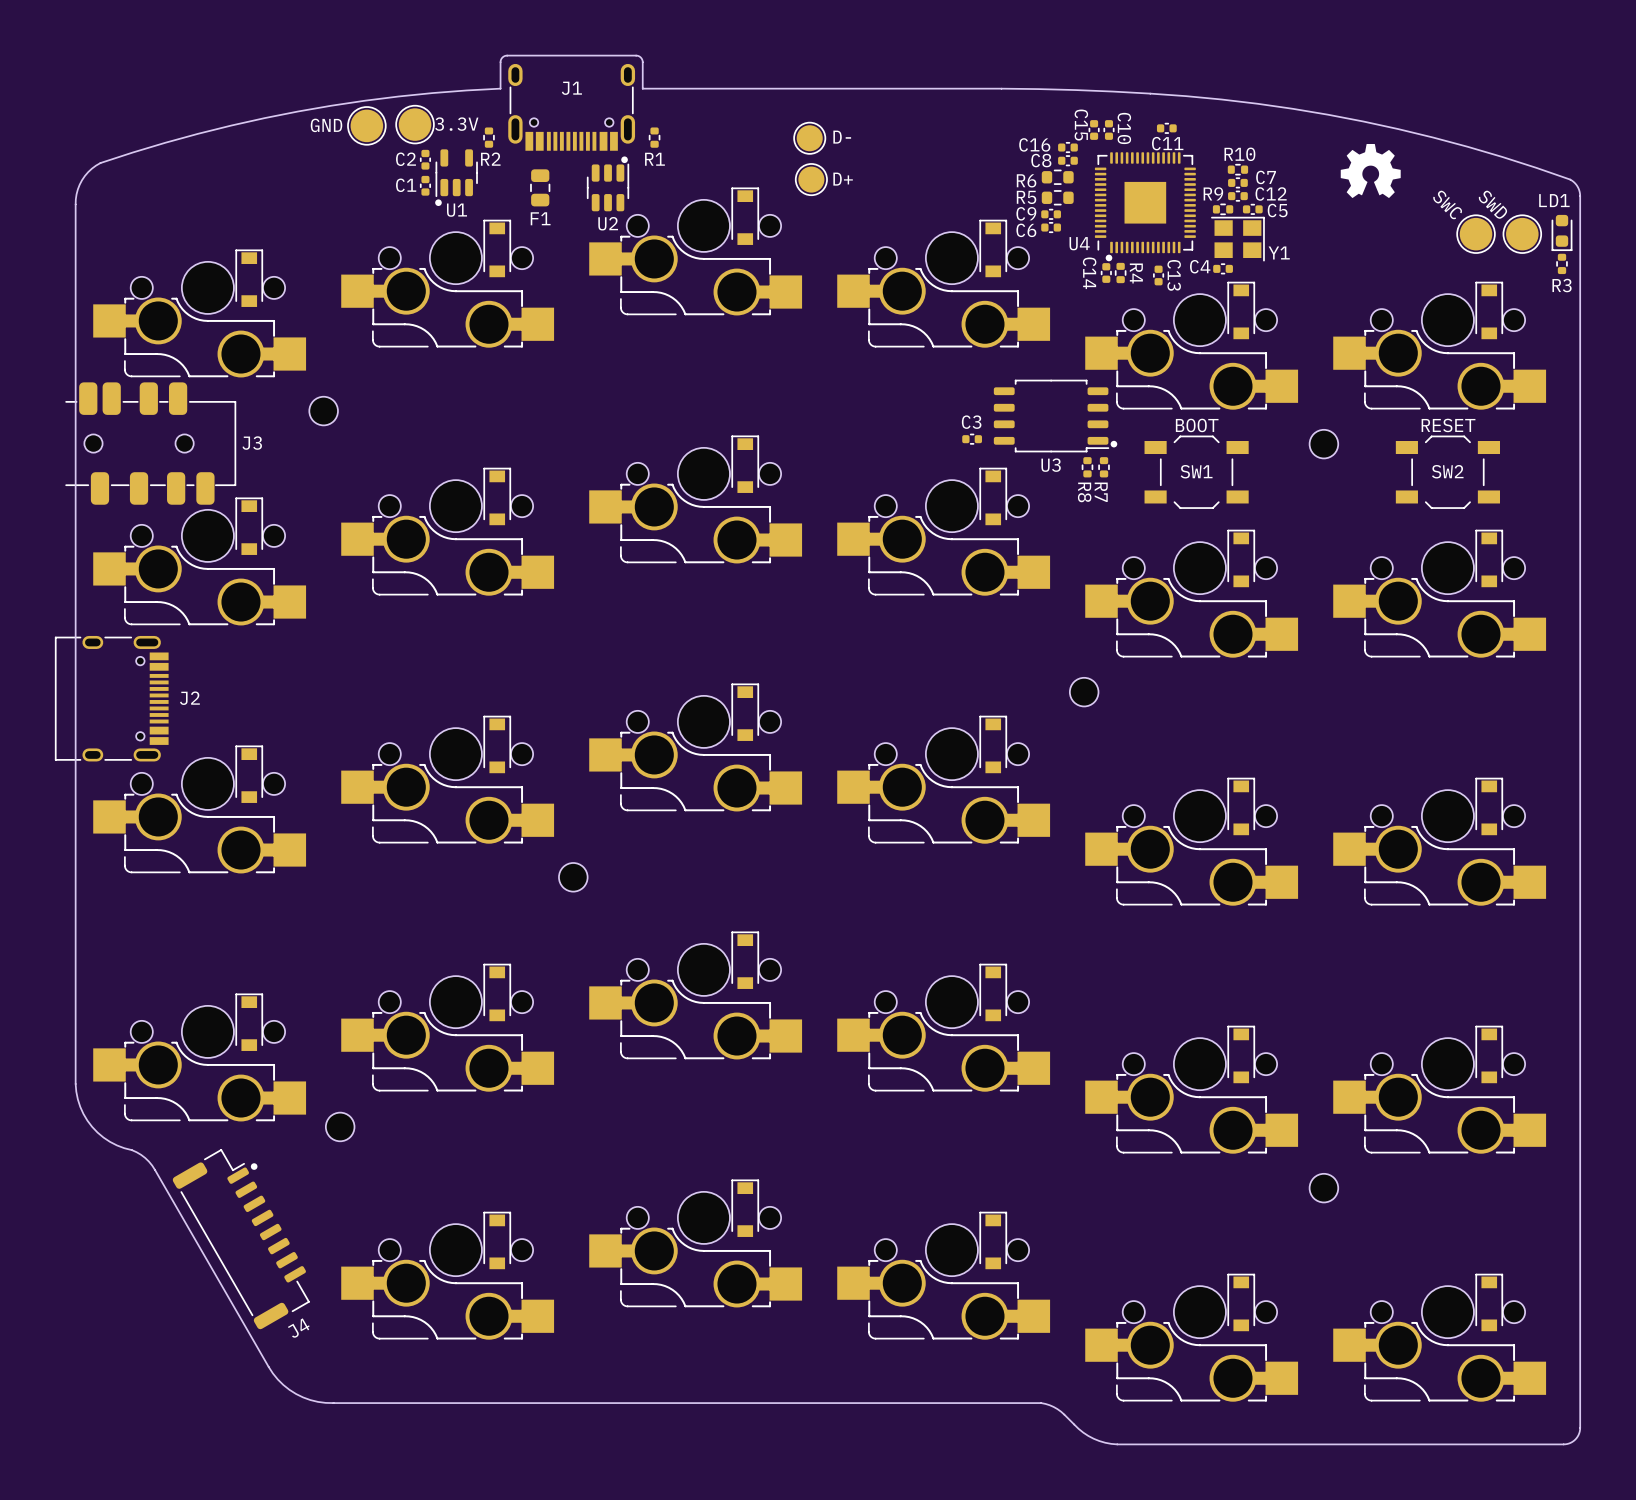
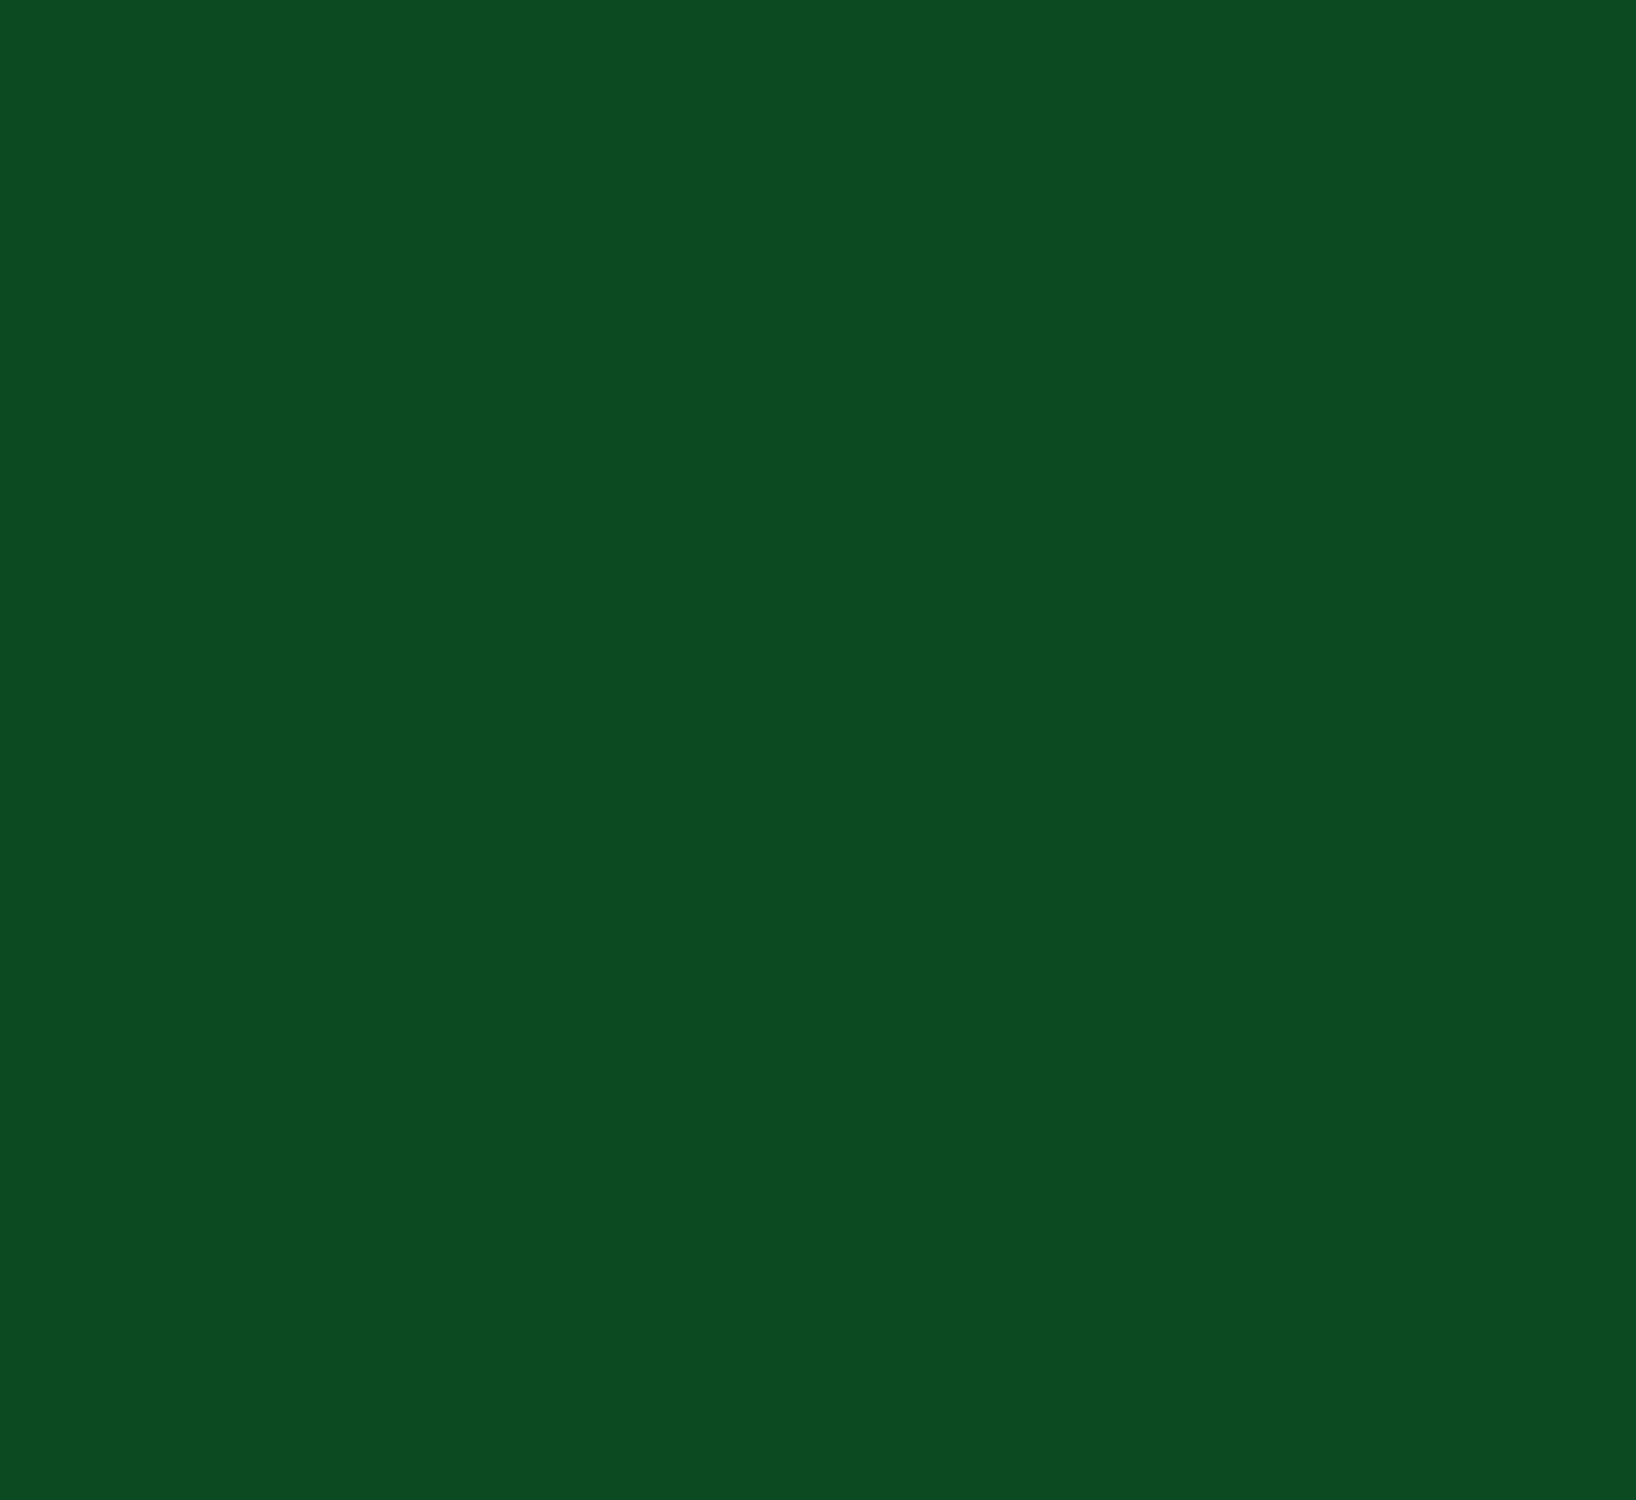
board edge: (636, 55) (505, 55) (500, 61) (500, 88) (432, 93) (365, 100) (297, 111) (231, 125) (165, 142) (100, 163) (88, 172) (79, 184) (75, 204) (75, 1083) (77, 1099) (87, 1120) (103, 1137) (116, 1145) (136, 1152) (148, 1161) (272, 1373) (283, 1384) (296, 1393) (318, 1401) (1041, 1403) (1057, 1409) (1088, 1435) (1099, 1441) (1117, 1444) (1563, 1444) (1572, 1441) (1577, 1436) (1580, 1427) (1580, 196) (1577, 186) (1570, 179) (1536, 167) (1433, 137) (1328, 114) (1257, 103) (1150, 93) (1038, 89) (642, 88) (642, 60) (636, 55) -> none
J1: (571, 107) -> none
part: (415, 124) -> none
part: (366, 125) -> none
C11: (1166, 128) -> none
C15: (1094, 129) -> none
C10: (1108, 129) -> none
R2: (488, 137) -> none
R1: (654, 137) -> none
part: (809, 138) -> none
drawing: [1340, 143, 1401, 198] -> none
C16: (1067, 147) -> none
drawing: [621, 156, 628, 164] -> none
C2: (425, 159) -> none
C8: (1067, 160) -> none
R10: (1237, 169) -> none
U1: (456, 173) -> none
R6: (1057, 177) -> none
part: (811, 179) -> none
C7: (1237, 182) -> none
C1: (425, 185) -> none
F1: (540, 187) -> none
U2: (608, 187) -> none
C12: (1237, 196) -> none
R5: (1057, 197) -> none
drawing: [435, 199, 442, 207] -> none
U4: (1145, 202) -> none
R9: (1223, 209) -> none
C5: (1252, 209) -> none
C9: (1051, 214) -> none
part: (745, 216) -> none
C6: (1051, 227) -> none
LD1: (1562, 232) -> none
part: (1476, 234) -> none
part: (1522, 234) -> none
Y1: (1237, 239) -> none
part: (497, 248) -> none
part: (993, 248) -> none
drawing: [1105, 254, 1113, 262] -> none
part: (695, 257) -> none
R3: (1562, 263) -> none
C4: (1223, 268) -> none
C14: (1106, 273) -> none
R4: (1120, 273) -> none
C13: (1158, 275) -> none
part: (249, 278) -> none
part: (447, 289) -> none
part: (943, 289) -> none
part: (1241, 310) -> none
part: (1489, 310) -> none
part: (199, 319) -> none
part: (1191, 351) -> none
part: (1439, 351) -> none
part: (323, 411) -> none
U3: (1051, 416) -> none
C3: (972, 439) -> none
drawing: [1110, 440, 1118, 448] -> none
J3: (150, 443) -> none
part: (1323, 444) -> none
part: (745, 464) -> none
R8: (1087, 467) -> none
R7: (1104, 467) -> none
SW1: (1196, 472) -> none
SW2: (1447, 472) -> none
part: (497, 496) -> none
part: (993, 496) -> none
part: (695, 505) -> none
part: (249, 526) -> none
part: (447, 537) -> none
part: (943, 537) -> none
part: (1241, 558) -> none
part: (1489, 558) -> none
part: (199, 567) -> none
part: (1191, 599) -> none
part: (1439, 599) -> none
part: (1084, 692) -> none
J2: (111, 698) -> none
part: (745, 712) -> none
part: (497, 744) -> none
part: (993, 744) -> none
part: (695, 753) -> none
part: (249, 774) -> none
part: (447, 785) -> none
part: (943, 785) -> none
part: (1241, 806) -> none
part: (1489, 806) -> none
part: (199, 815) -> none
part: (1191, 847) -> none
part: (1439, 847) -> none
part: (573, 877) -> none
part: (745, 960) -> none
part: (497, 992) -> none
part: (993, 992) -> none
part: (695, 1001) -> none
part: (249, 1022) -> none
part: (447, 1033) -> none
part: (943, 1033) -> none
part: (1241, 1054) -> none
part: (1489, 1054) -> none
part: (199, 1063) -> none
part: (1191, 1095) -> none
part: (1439, 1095) -> none
part: (340, 1126) -> none
drawing: [250, 1163, 258, 1170] -> none
part: (1323, 1188) -> none
part: (745, 1208) -> none
J4: (241, 1239) -> none
part: (497, 1240) -> none
part: (993, 1240) -> none
part: (695, 1249) -> none
part: (447, 1281) -> none
part: (943, 1281) -> none
part: (1241, 1302) -> none
part: (1489, 1302) -> none
part: (1191, 1343) -> none
part: (1439, 1343) -> none

